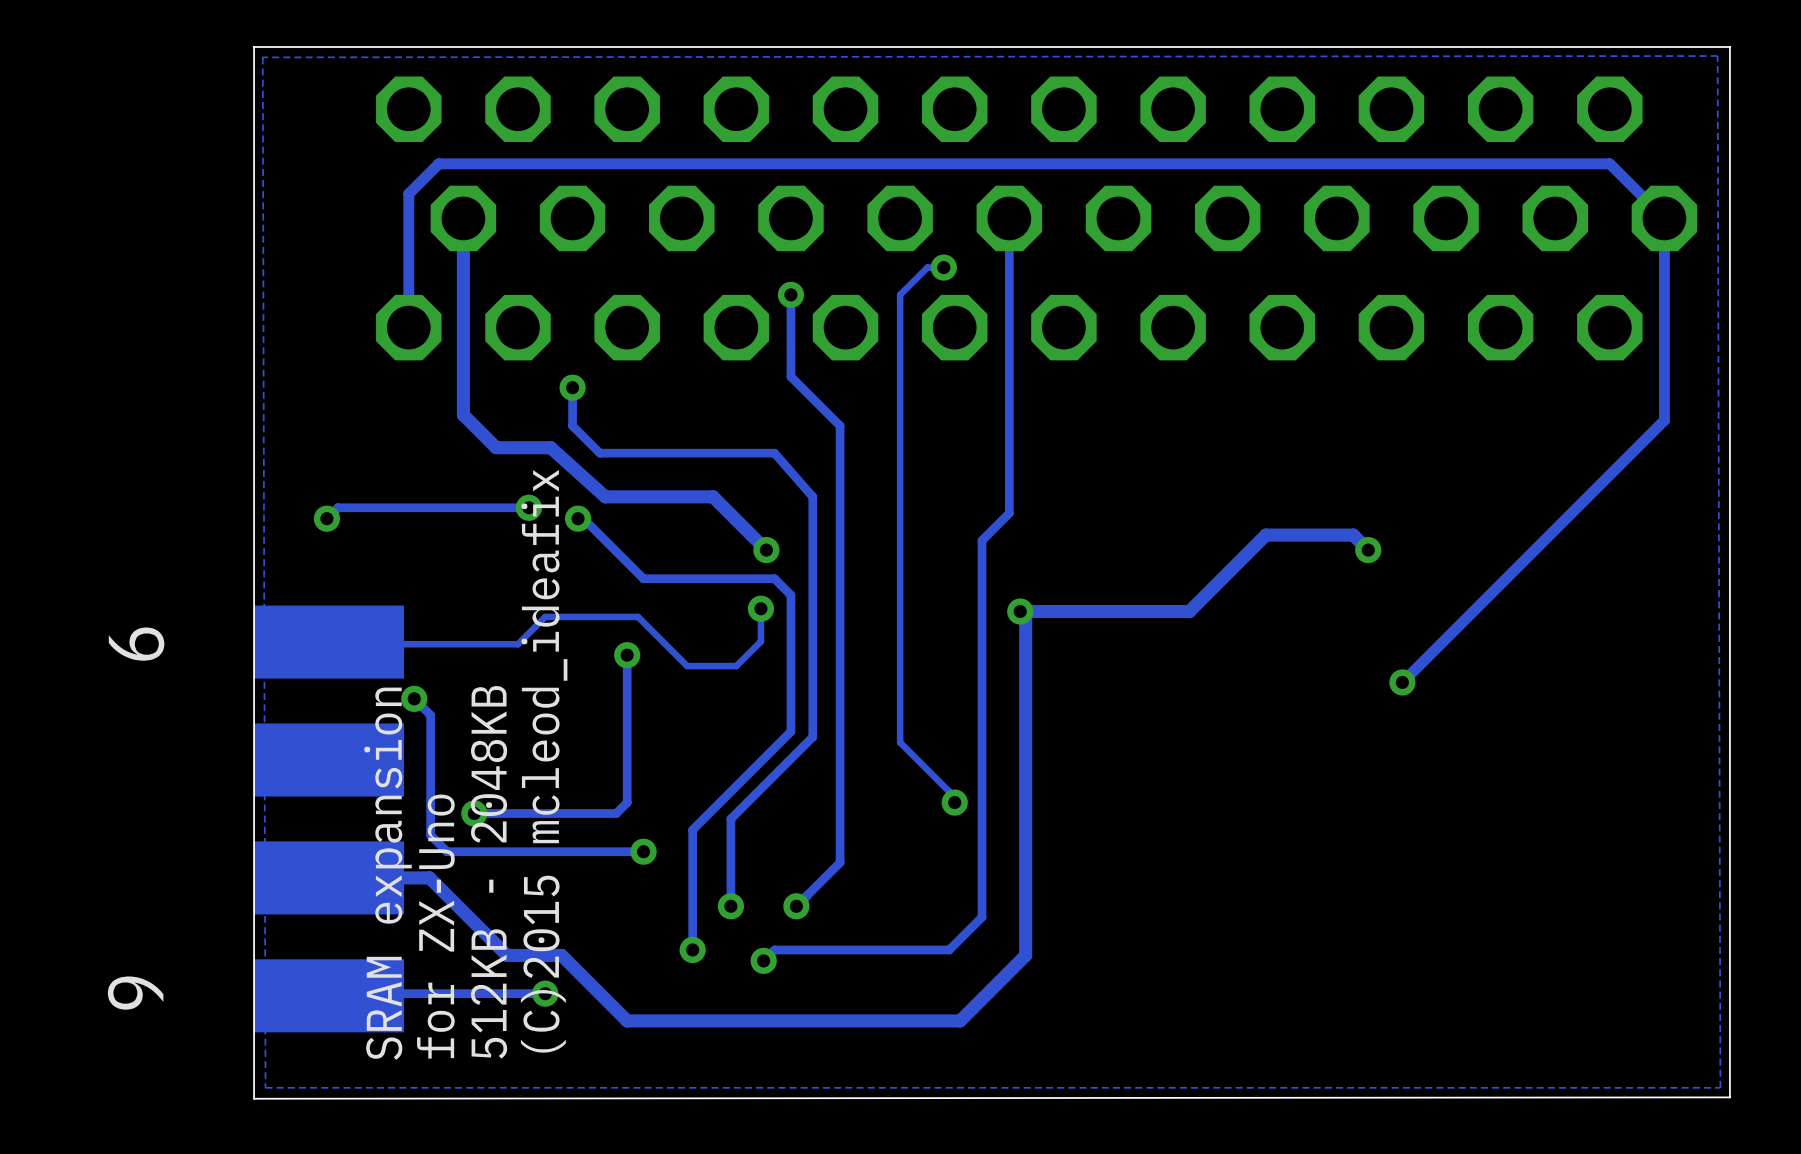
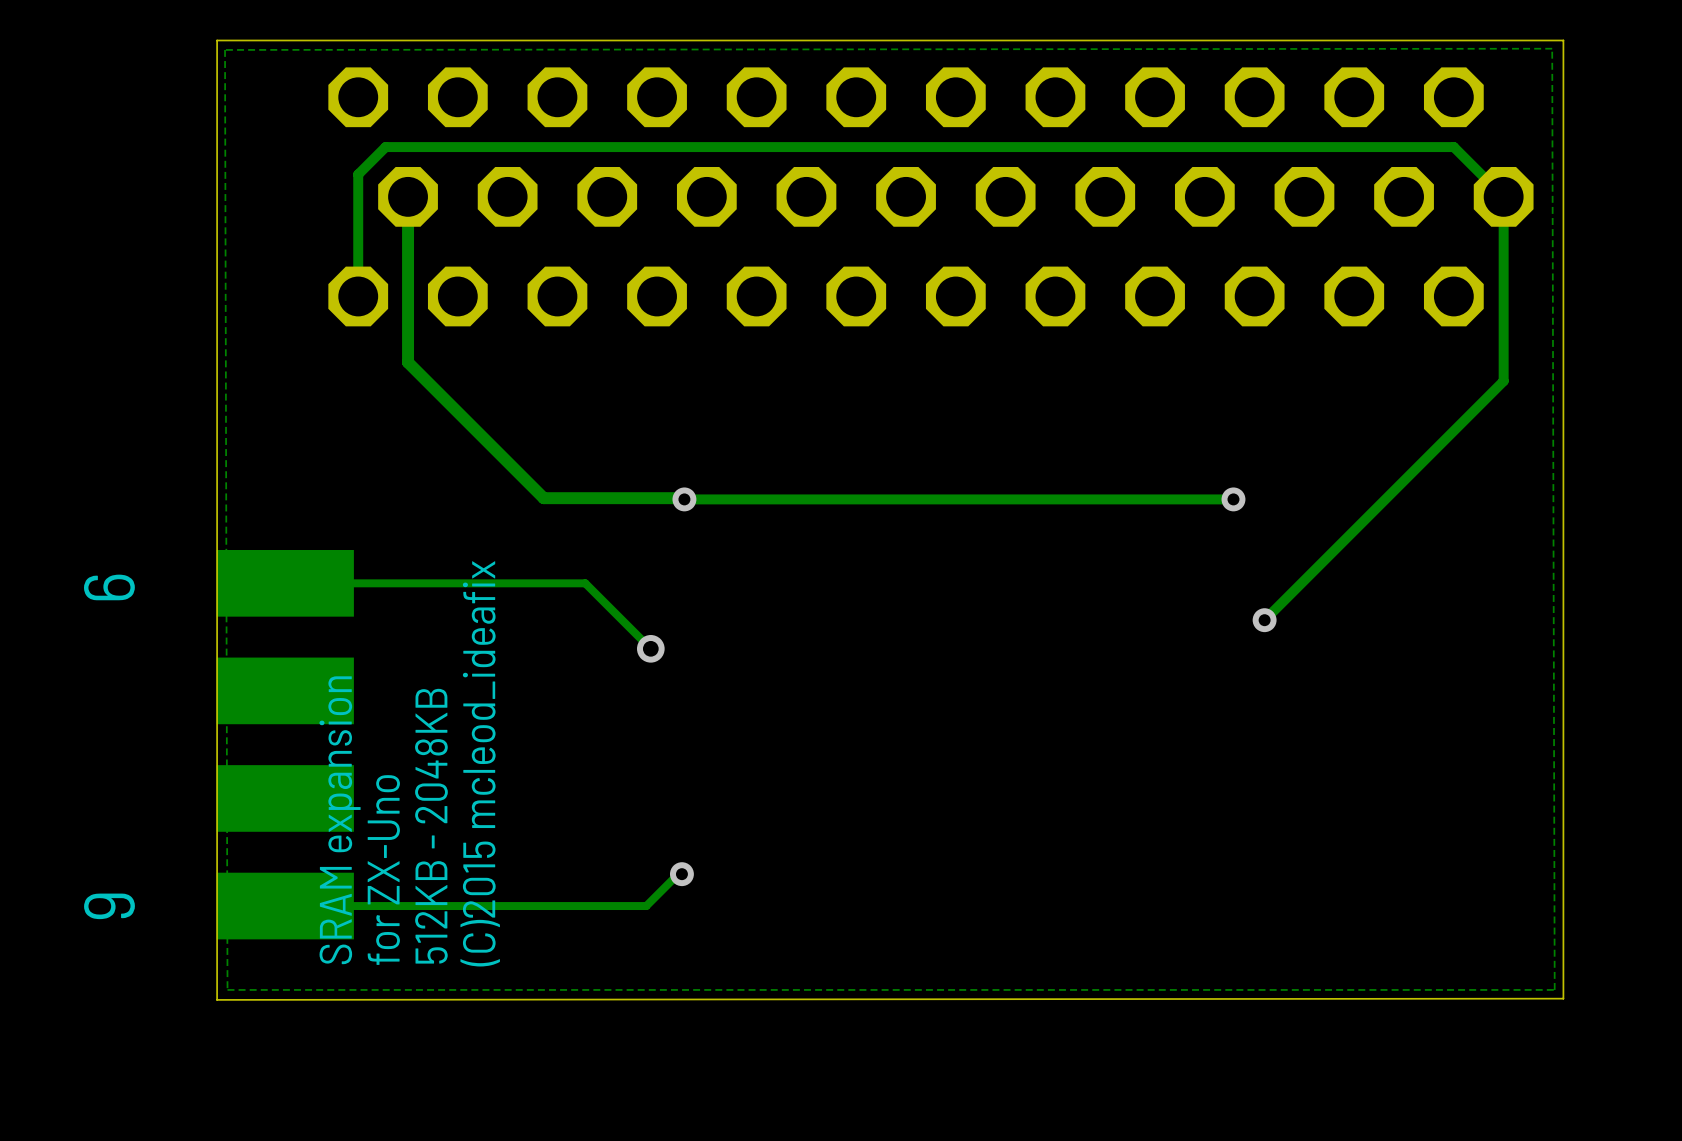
track: (1009, 218) (1009, 513) (982, 540) (982, 917) (949, 949) (774, 949) (763, 960) -> none
track: (943, 267) (927, 267) (900, 294) (900, 742) (949, 791) (949, 797) (954, 802) -> none
via: (943, 267) -> none
track: (790, 294) (790, 376) (840, 425) (840, 862) (796, 906) -> none
via: (790, 294) -> none
track: (572, 387) (572, 425) (599, 453) (774, 453) (812, 496) (812, 737) (730, 818) (730, 906) -> none
via: (572, 387) -> none
track: (463, 399) (463, 414) (496, 447) (550, 447) (605, 496) (713, 496) (765, 548) -> (408, 362) (543, 498) (683, 498)
track: (528, 507) (337, 507) (326, 518) -> none
via: (528, 507) -> none
via: (326, 518) -> none
track: (578, 518) (583, 518) (643, 578) (774, 578) (790, 595) (790, 731) (692, 829) (692, 949) -> none
via: (578, 518) -> none
track: (1368, 550) (1353, 535) (1265, 535) (1189, 611) (1020, 611) (1025, 616) (1025, 955) (960, 1020) (627, 1020) (561, 955) (507, 955) (429, 877) (328, 877) -> (1233, 499) (684, 499)
track: (760, 608) (760, 641) (736, 666) (687, 666) (638, 616) (545, 616) (517, 644) (331, 644) (328, 642) -> (650, 648) (585, 583) (285, 583)
via: (760, 608) -> none
via: (1020, 611) -> none
track: (627, 655) (627, 802) (616, 813) (474, 813) -> none
via: (627, 655) -> none
track: (414, 698) (430, 715) (430, 835) (447, 851) (643, 851) -> none
via: (414, 698) -> none
via: none -> (650, 648)
via: (954, 802) -> none
via: (474, 813) -> none
via: (643, 851) -> none
via: (730, 906) -> none
via: (796, 906) -> none
via: (692, 949) -> none
track: (545, 993) (331, 993) (328, 995) -> (681, 870) (646, 906) (285, 906)
via: (545, 993) -> none

